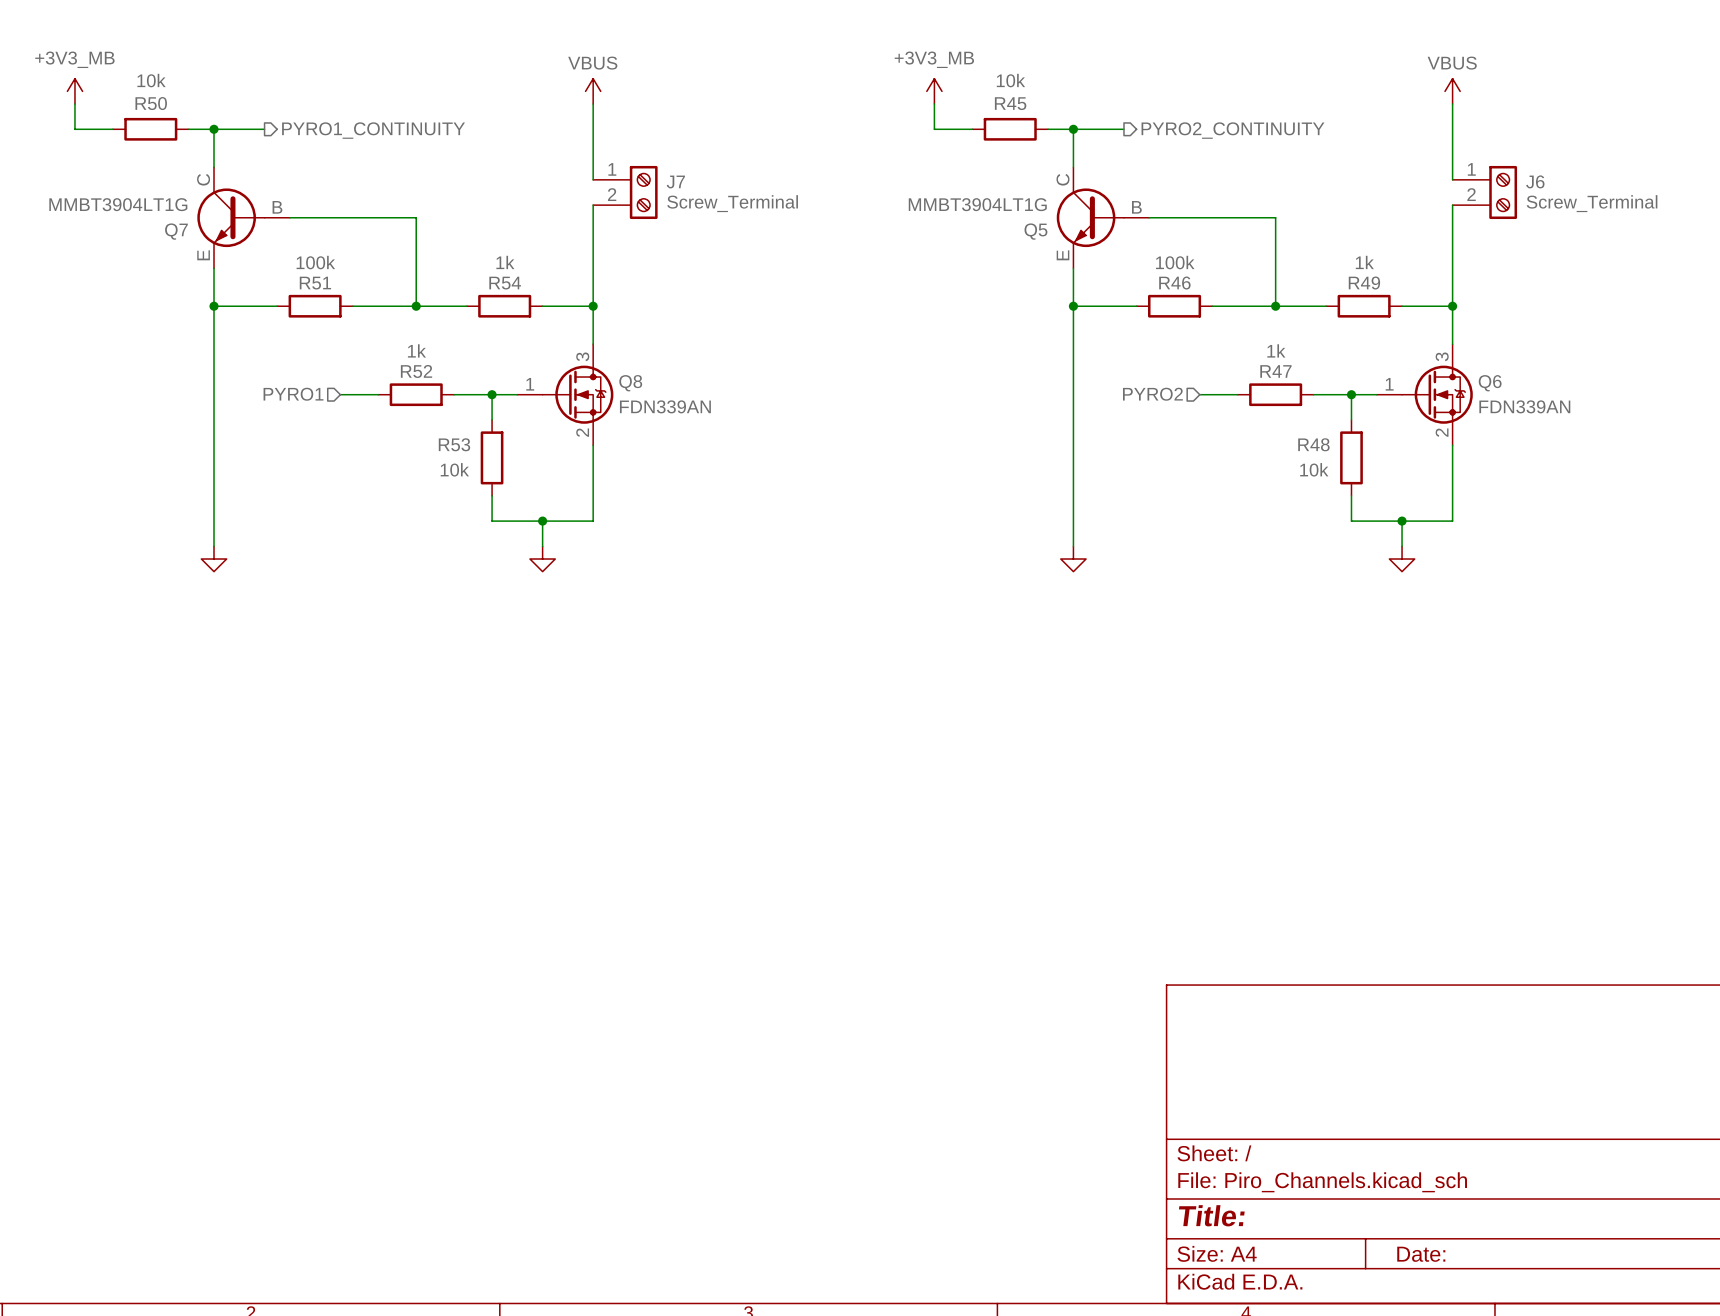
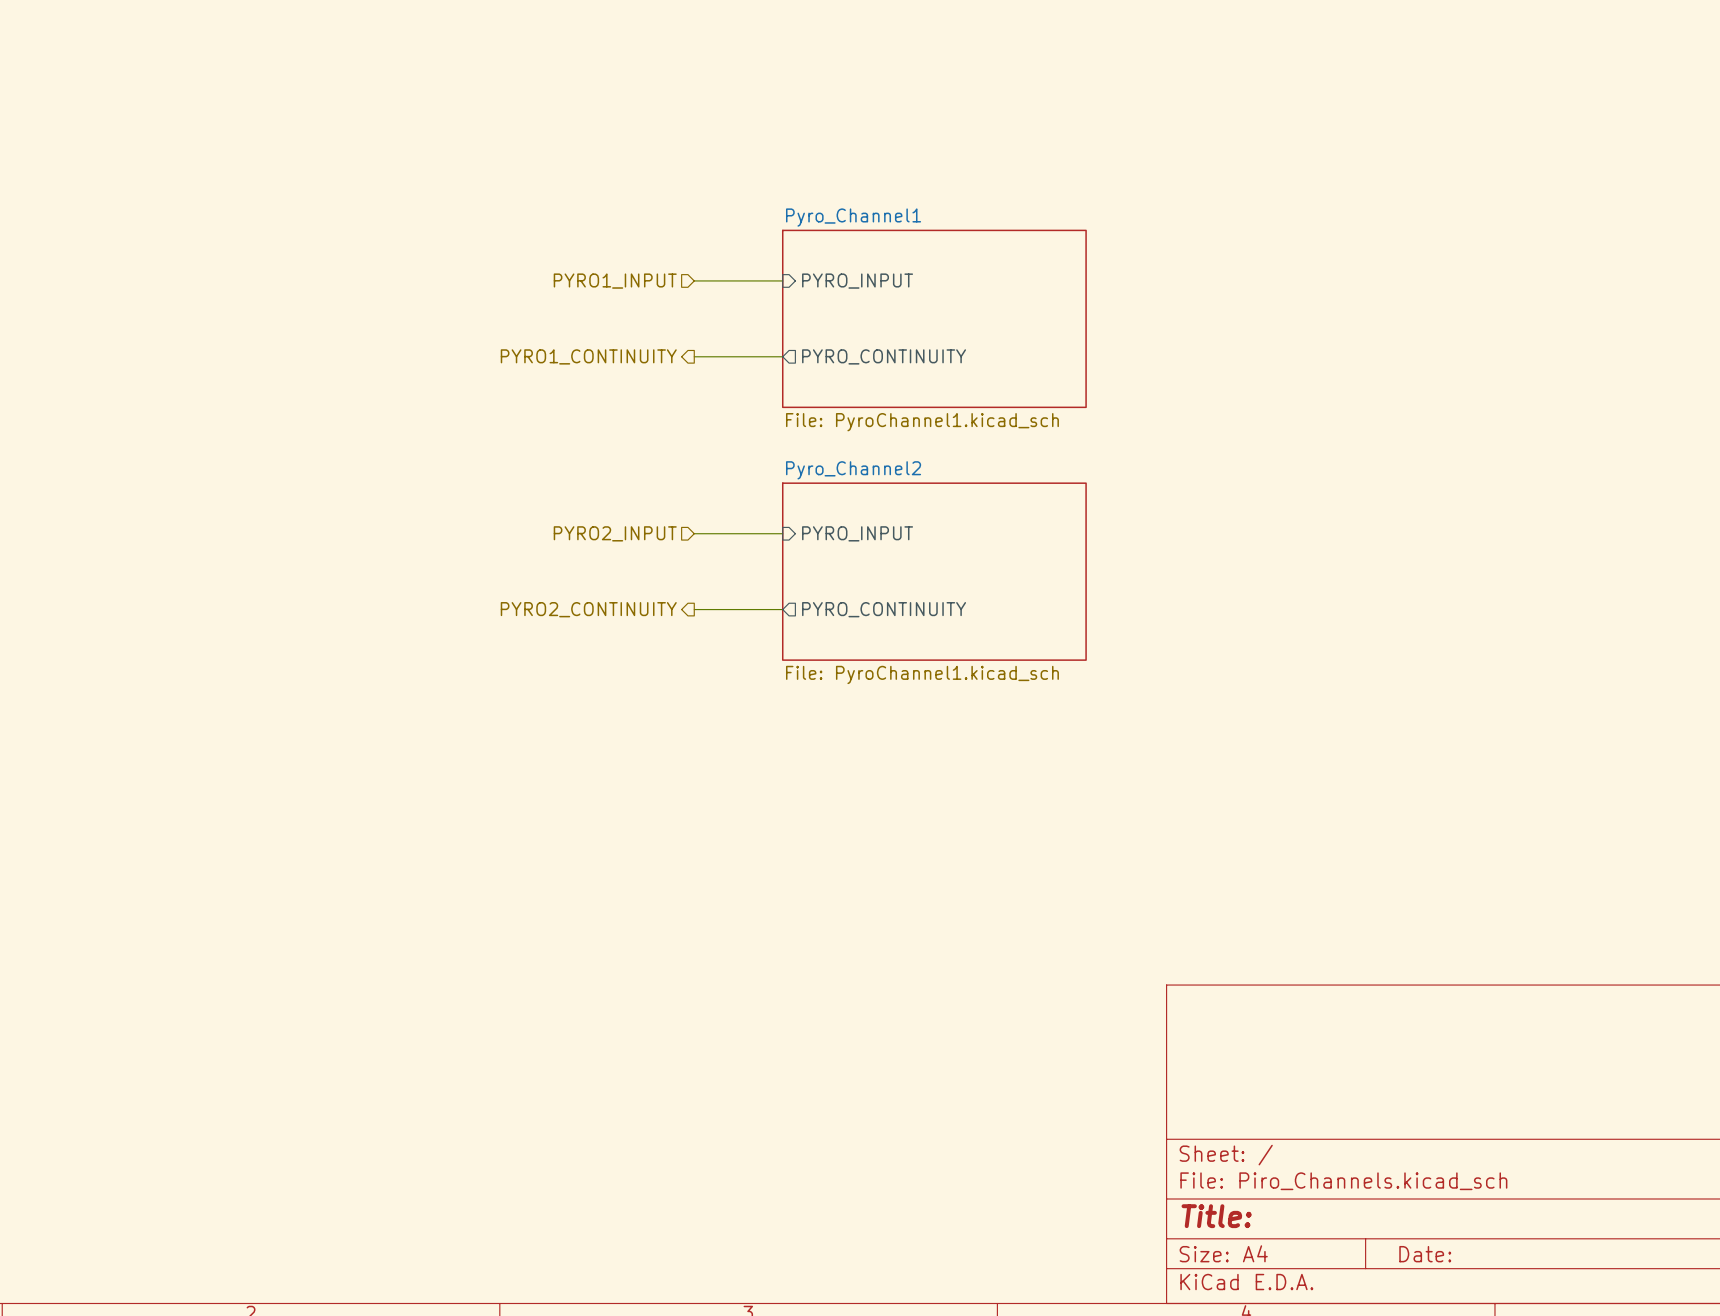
power symbol: +3V3_MB (74, 91) -> none
power symbol: VBUS (593, 91) -> none
power symbol: +3V3_MB (934, 91) -> none
power symbol: VBUS (1452, 91) -> none
wire: (74, 104) (74, 129) (112, 129) -> none
wire: (593, 104) (593, 179) -> none
wire: (934, 104) (934, 129) (972, 129) -> none
wire: (1452, 104) (1452, 179) -> none
R50: 10k (150, 129) -> none
wire: (188, 129) (264, 129) -> none
wire: (214, 129) (214, 167) -> none
junction: (214, 129) -> none
R45: 10k (1010, 129) -> none
wire: (1048, 129) (1123, 129) -> none
wire: (1073, 129) (1073, 167) -> none
junction: (1073, 129) -> none
hierarchical label: PYRO1_CONTINUITY (373, 130) -> none
hierarchical label: PYRO2_CONTINUITY (1232, 130) -> none
J7: Screw_Terminal (625, 192) -> none
J6: Screw_Terminal (1484, 192) -> none
wire: (593, 205) (593, 344) -> none
wire: (1452, 205) (1452, 344) -> none
Q7: MMBT3904LT1G (243, 217) -> none
wire: (289, 217) (416, 217) (416, 306) -> none
Q5: MMBT3904LT1G (1103, 217) -> none
wire: (1149, 217) (1275, 217) (1275, 306) -> none
wire: (214, 268) (214, 546) -> none
wire: (1073, 268) (1073, 546) -> none
wire: none -> (694, 280) (782, 280)
hierarchical label: none -> PYRO1_INPUT (615, 281)
sheet pin: none -> PYRO_INPUT (857, 281)
wire: (214, 306) (277, 306) -> none
junction: (214, 306) -> none
R51: 100k (315, 306) -> none
wire: (353, 306) (466, 306) -> none
junction: (416, 306) -> none
R54: 1k (504, 306) -> none
wire: (542, 306) (593, 306) -> none
junction: (593, 306) -> none
wire: (1073, 306) (1136, 306) -> none
junction: (1073, 306) -> none
R46: 100k (1174, 306) -> none
wire: (1212, 306) (1326, 306) -> none
junction: (1275, 306) -> none
R49: 1k (1364, 306) -> none
wire: (1402, 306) (1452, 306) -> none
junction: (1452, 306) -> none
sheet Pyro_Channel1: none -> File: PyroChannel1.kicad_sch (934, 318)
wire: none -> (694, 356) (782, 356)
hierarchical label: none -> PYRO1_CONTINUITY (588, 356)
sheet pin: none -> PYRO_CONTINUITY (884, 356)
hierarchical label: PYRO1 (293, 394) -> none
wire: (340, 394) (378, 394) -> none
R52: 1k (416, 394) -> none
wire: (454, 394) (517, 394) -> none
wire: (492, 394) (492, 419) -> none
junction: (492, 394) -> none
Q8: FDN339AN (565, 394) -> none
hierarchical label: PYRO2 (1152, 394) -> none
wire: (1199, 394) (1237, 394) -> none
R47: 1k (1275, 394) -> none
wire: (1313, 394) (1376, 394) -> none
wire: (1351, 394) (1351, 419) -> none
junction: (1351, 394) -> none
Q6: FDN339AN (1424, 394) -> none
wire: (593, 445) (593, 521) (492, 521) (492, 495) -> none
wire: (1452, 445) (1452, 521) (1351, 521) (1351, 495) -> none
R53: 10k (492, 457) -> none
R48: 10k (1351, 457) -> none
wire: (542, 521) (542, 546) -> none
junction: (542, 521) -> none
wire: (1402, 521) (1402, 546) -> none
junction: (1402, 521) -> none
wire: none -> (694, 533) (782, 533)
hierarchical label: none -> PYRO2_INPUT (615, 533)
sheet pin: none -> PYRO_INPUT (857, 533)
power symbol: (214, 559) -> none
power symbol: (542, 559) -> none
power symbol: (1073, 559) -> none
power symbol: (1402, 559) -> none
sheet Pyro_Channel2: none -> File: PyroChannel1.kicad_sch (934, 571)
wire: none -> (694, 609) (782, 609)
hierarchical label: none -> PYRO2_CONTINUITY (588, 609)
sheet pin: none -> PYRO_CONTINUITY (884, 609)

